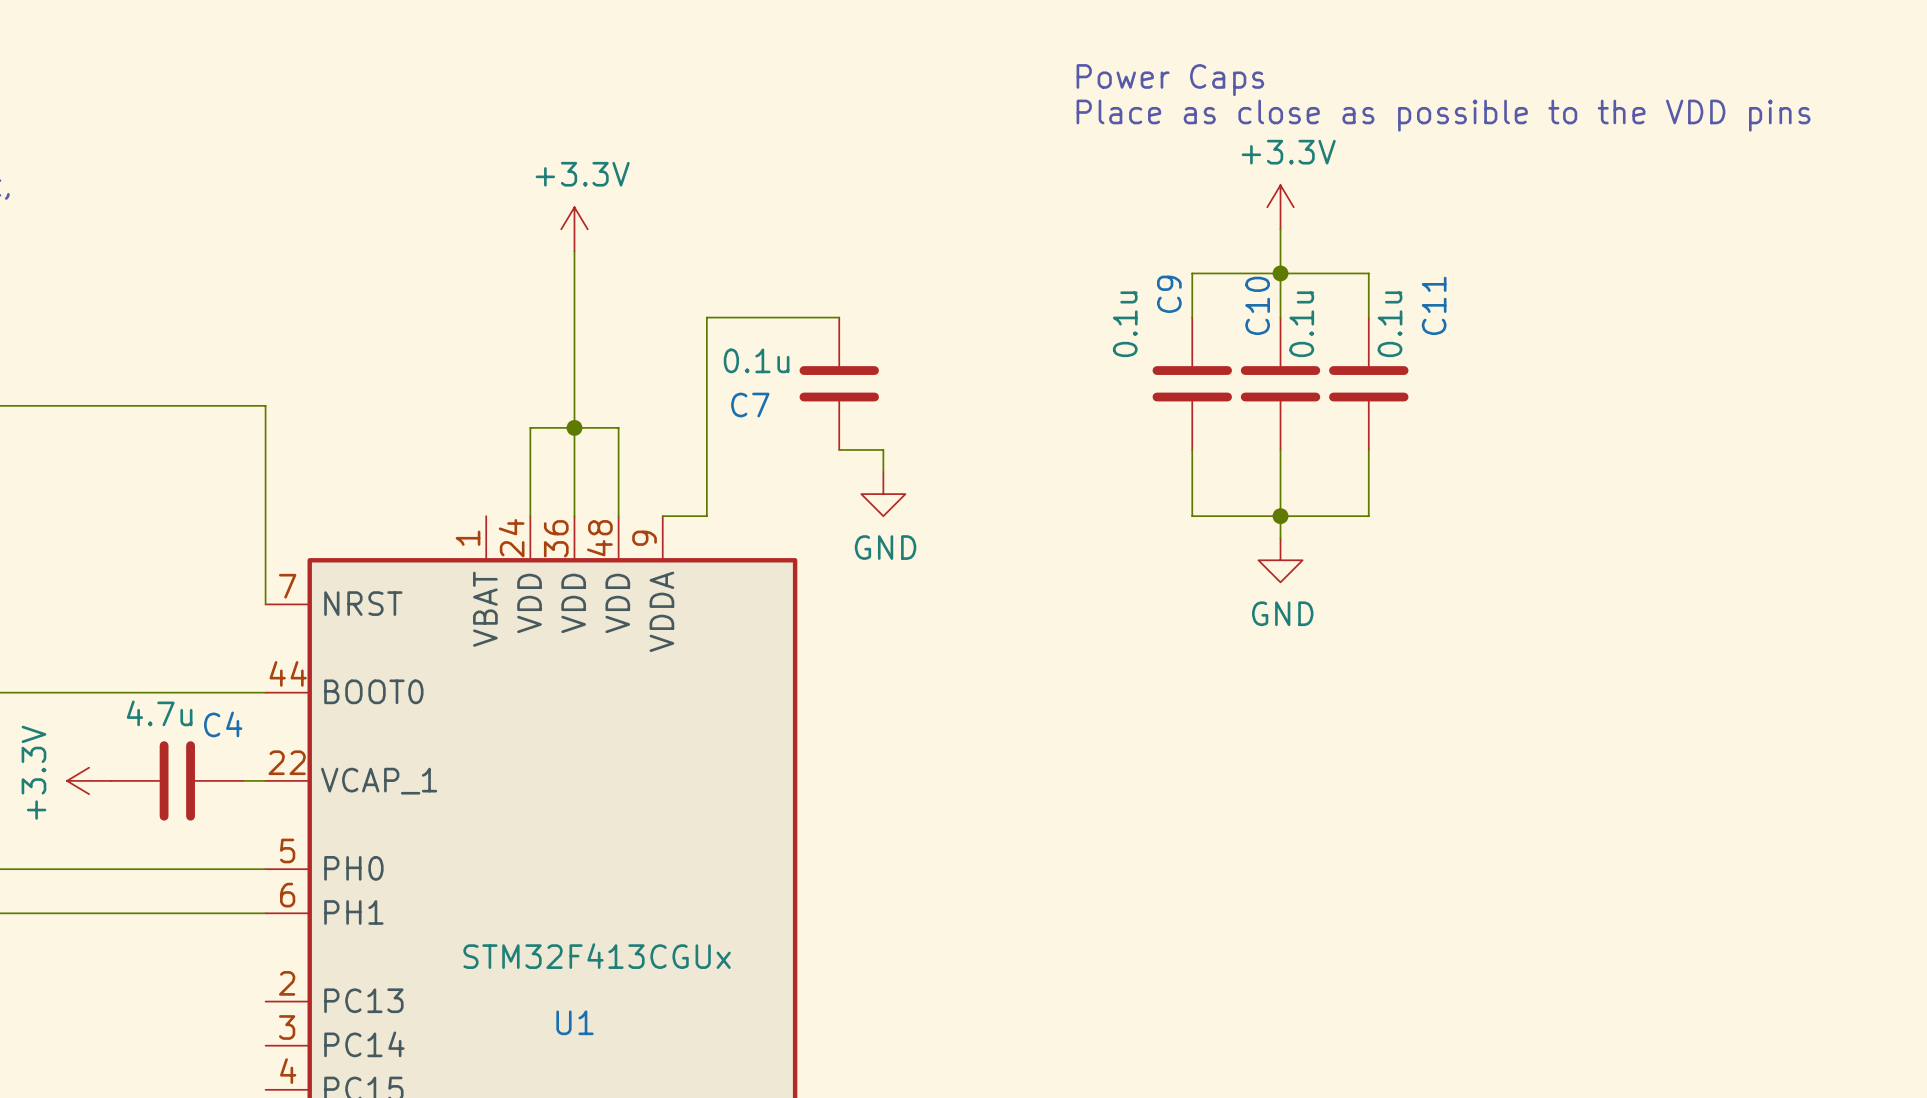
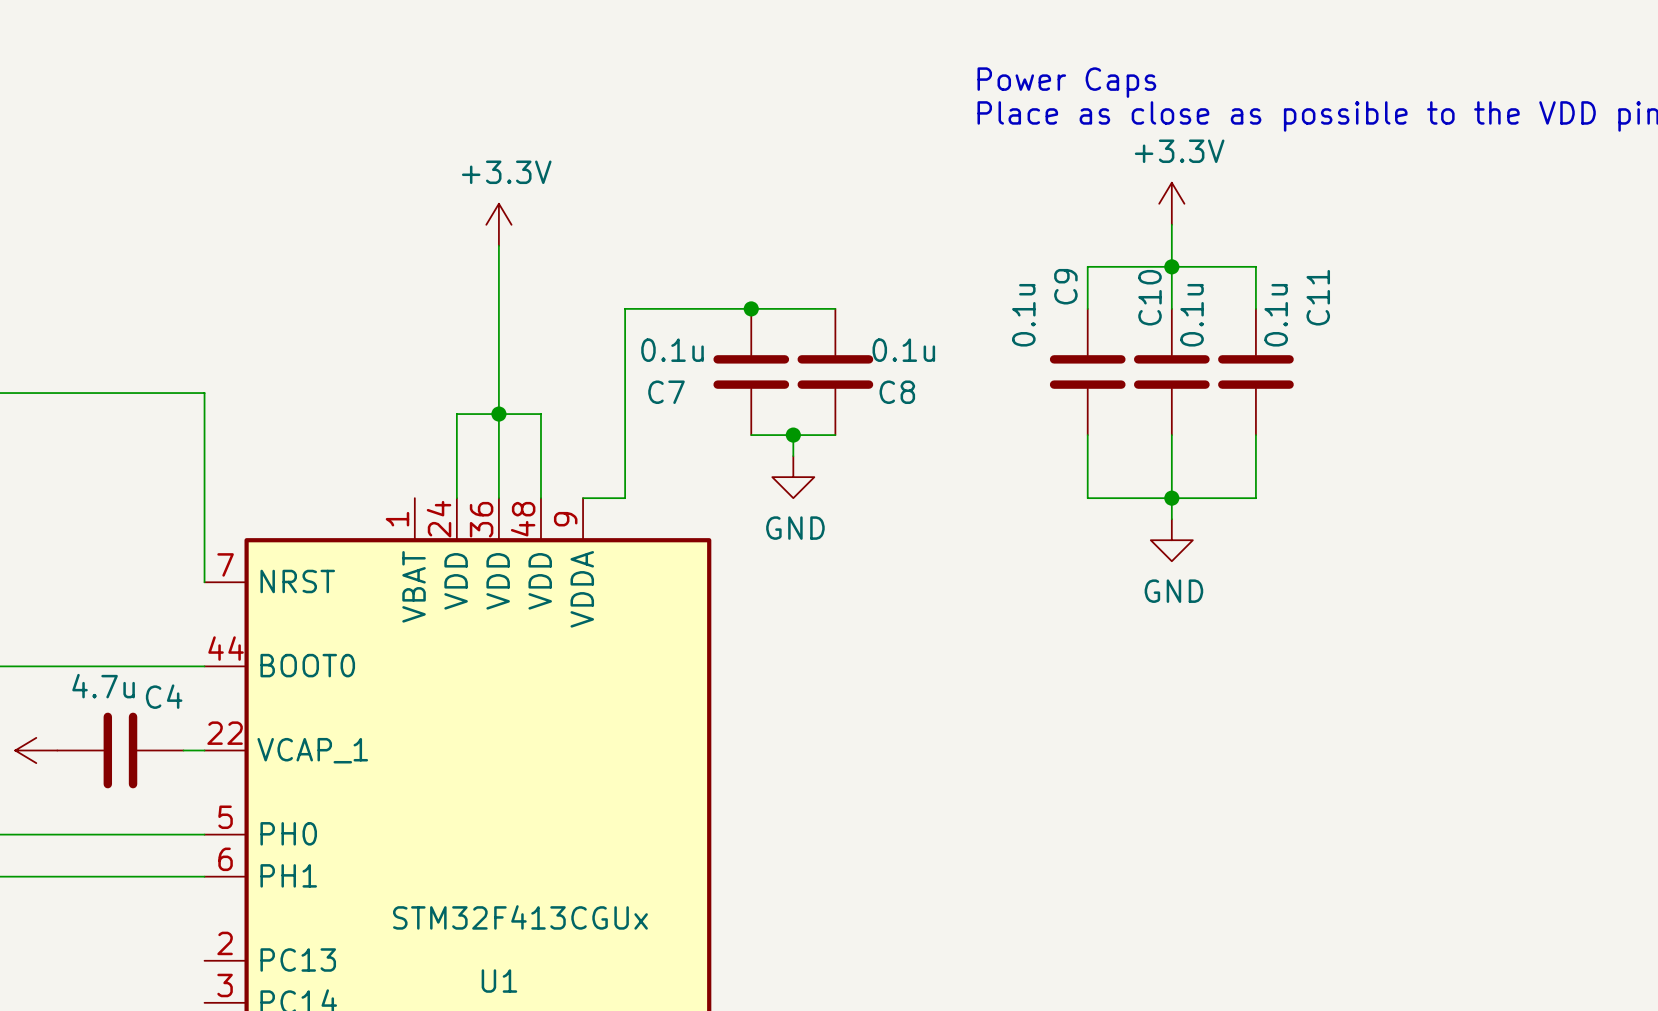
wire: none -> (751, 308) (835, 308)
junction: none -> (751, 308)
C8: none -> 0.1u (835, 371)
wire: none -> (793, 435) (835, 435)
junction: none -> (793, 435)

